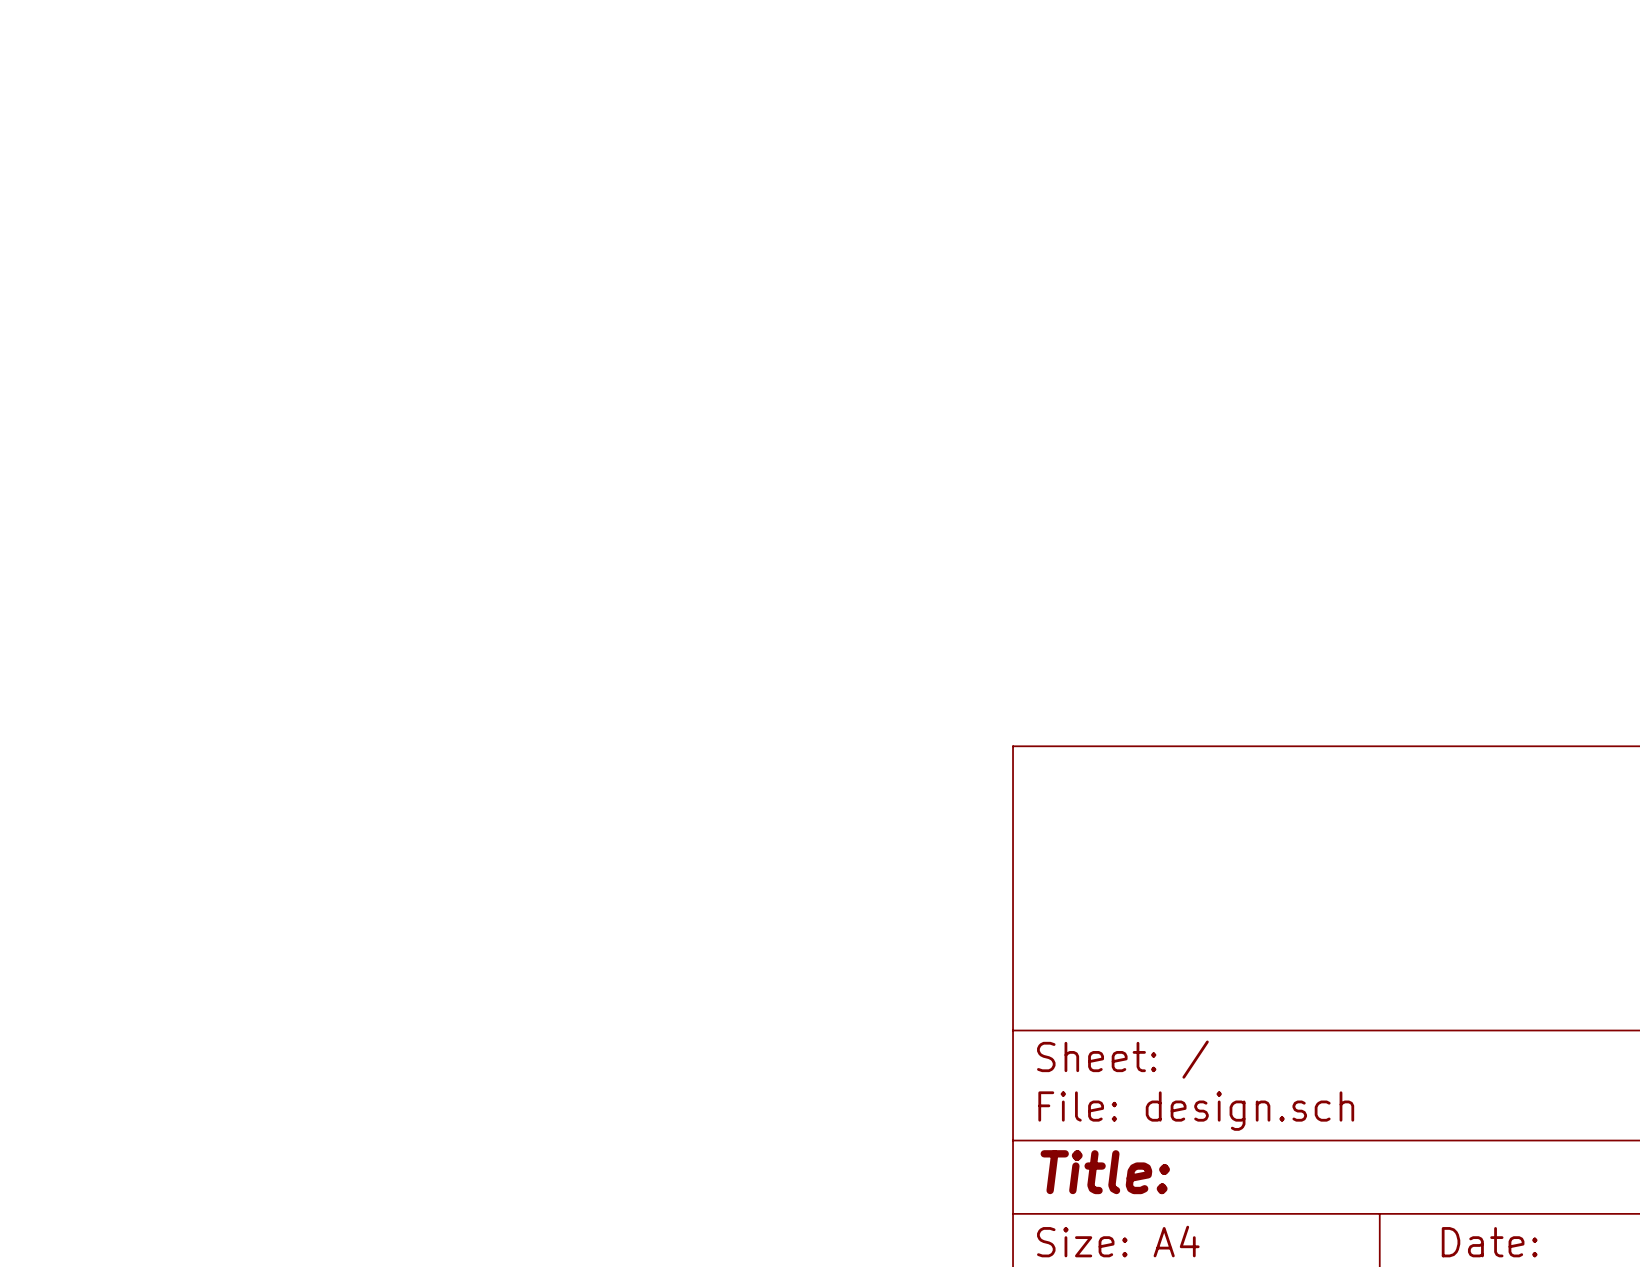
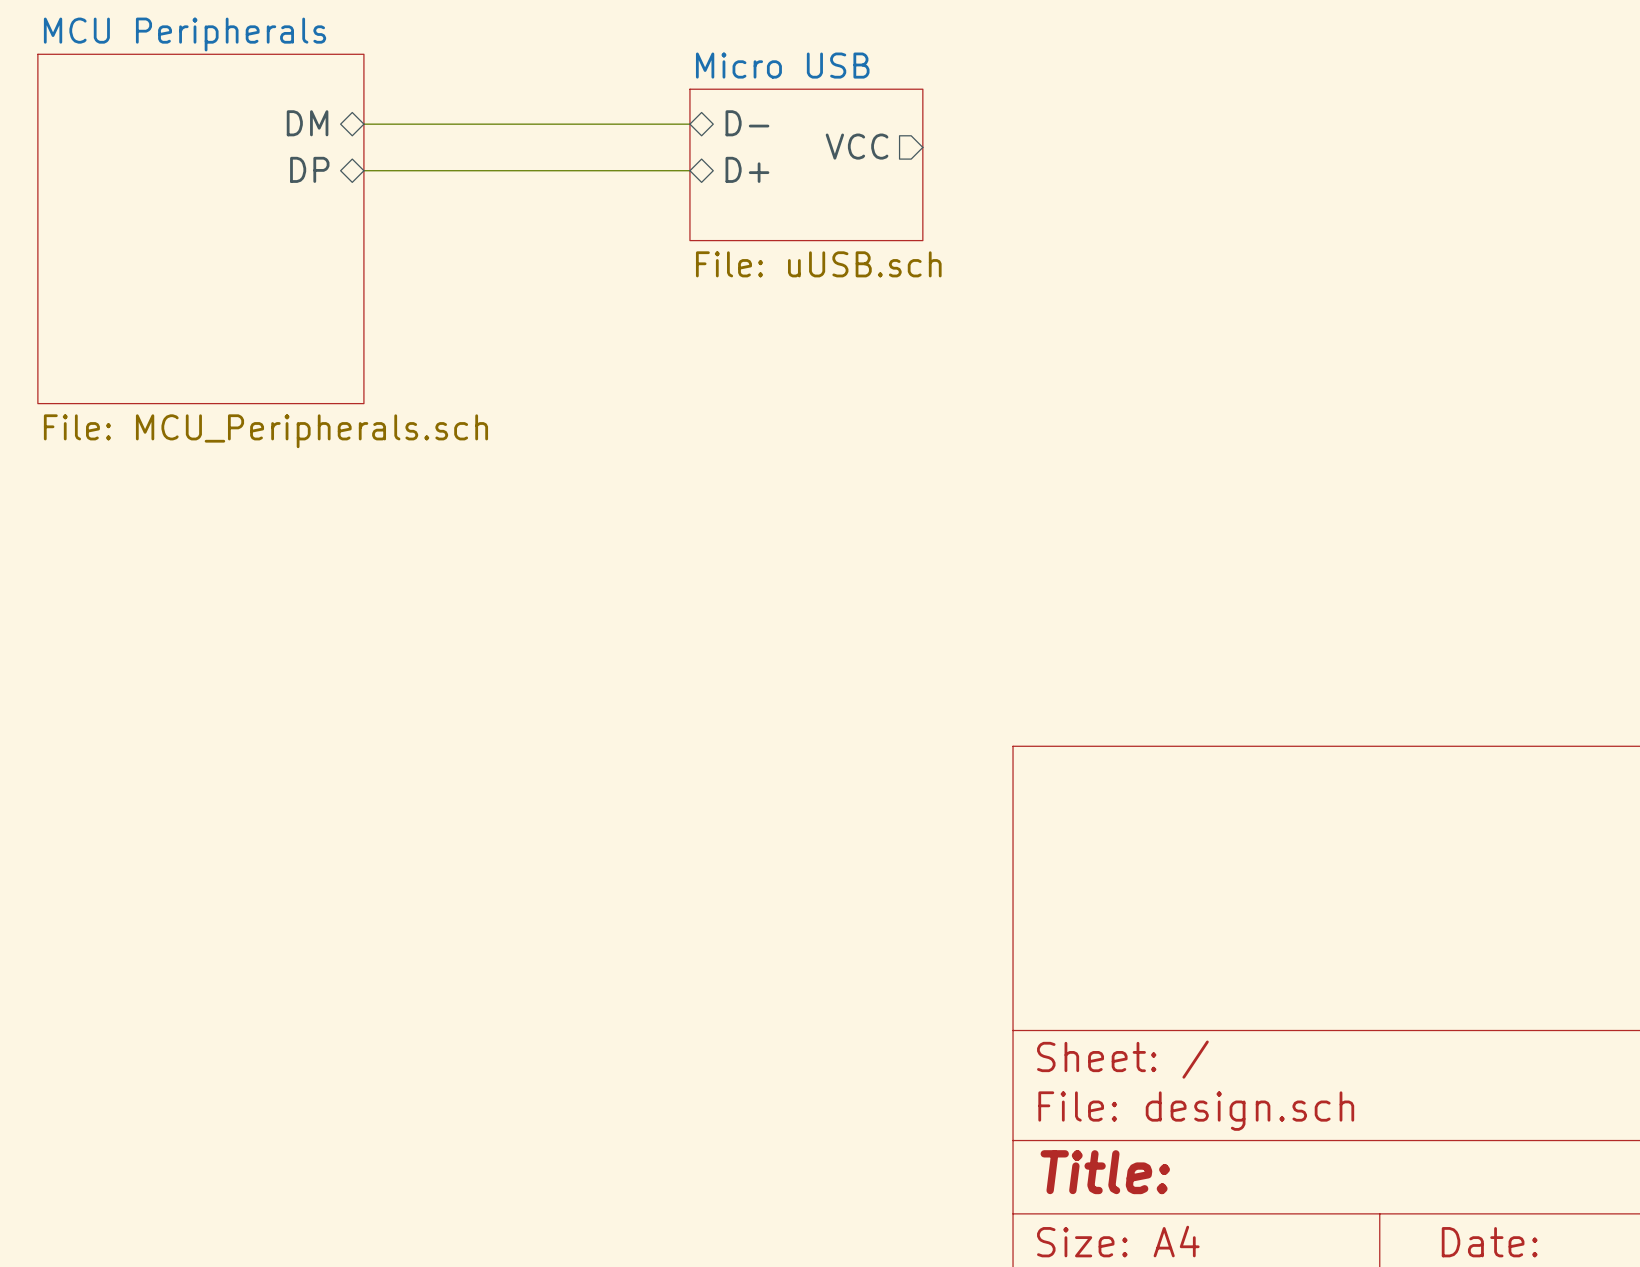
sheet pin: none -> DM (307, 123)
sheet pin: none -> D- (747, 123)
wire: none -> (363, 124) (689, 124)
sheet pin: none -> VCC (857, 146)
sheet Micro USB: none -> File: uUSB.sch (806, 164)
sheet pin: none -> DP (309, 169)
sheet pin: none -> D+ (747, 169)
wire: none -> (363, 170) (689, 170)
sheet MCU Peripherals: none -> File: MCU_Peripherals.sch (200, 228)

